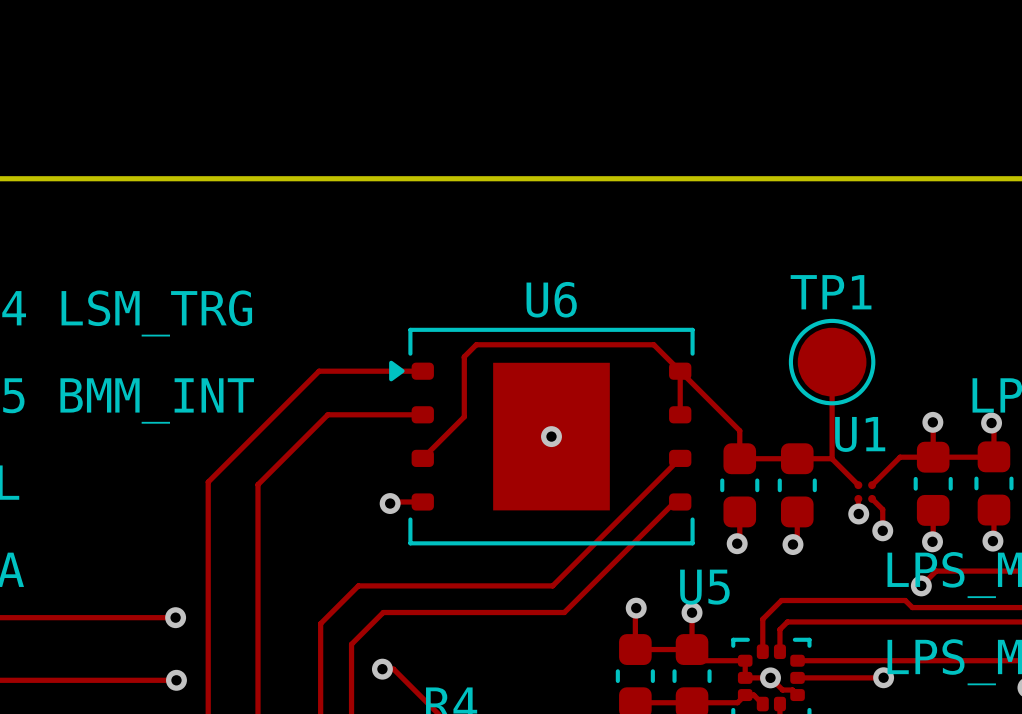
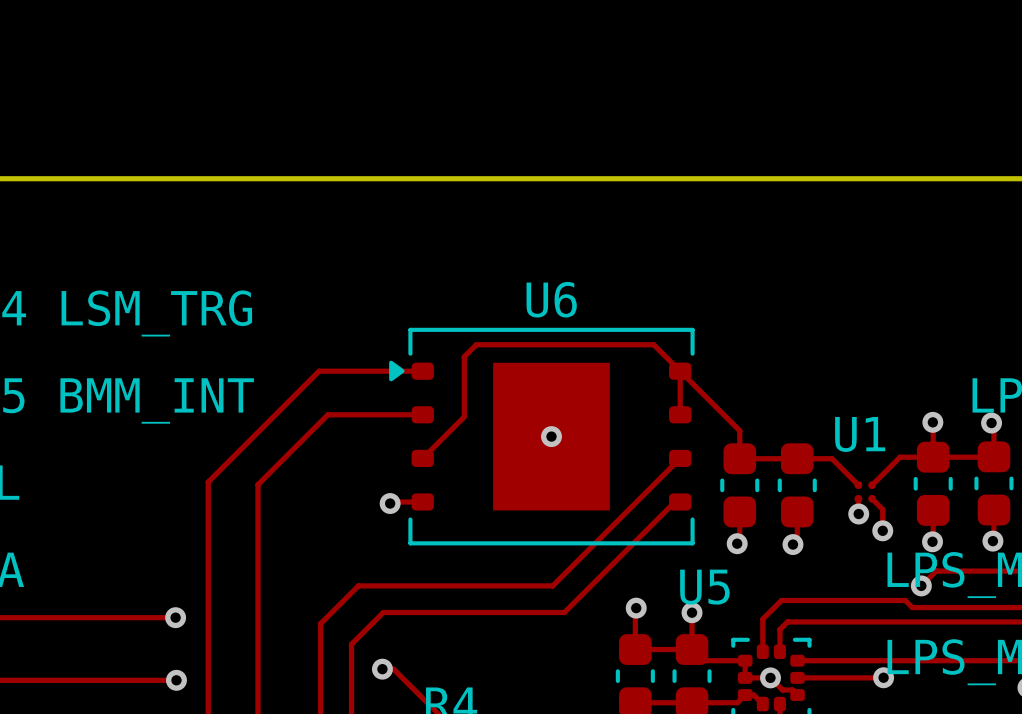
track: (832, 362) (832, 458) -> none
TP1: (832, 362) -> none

